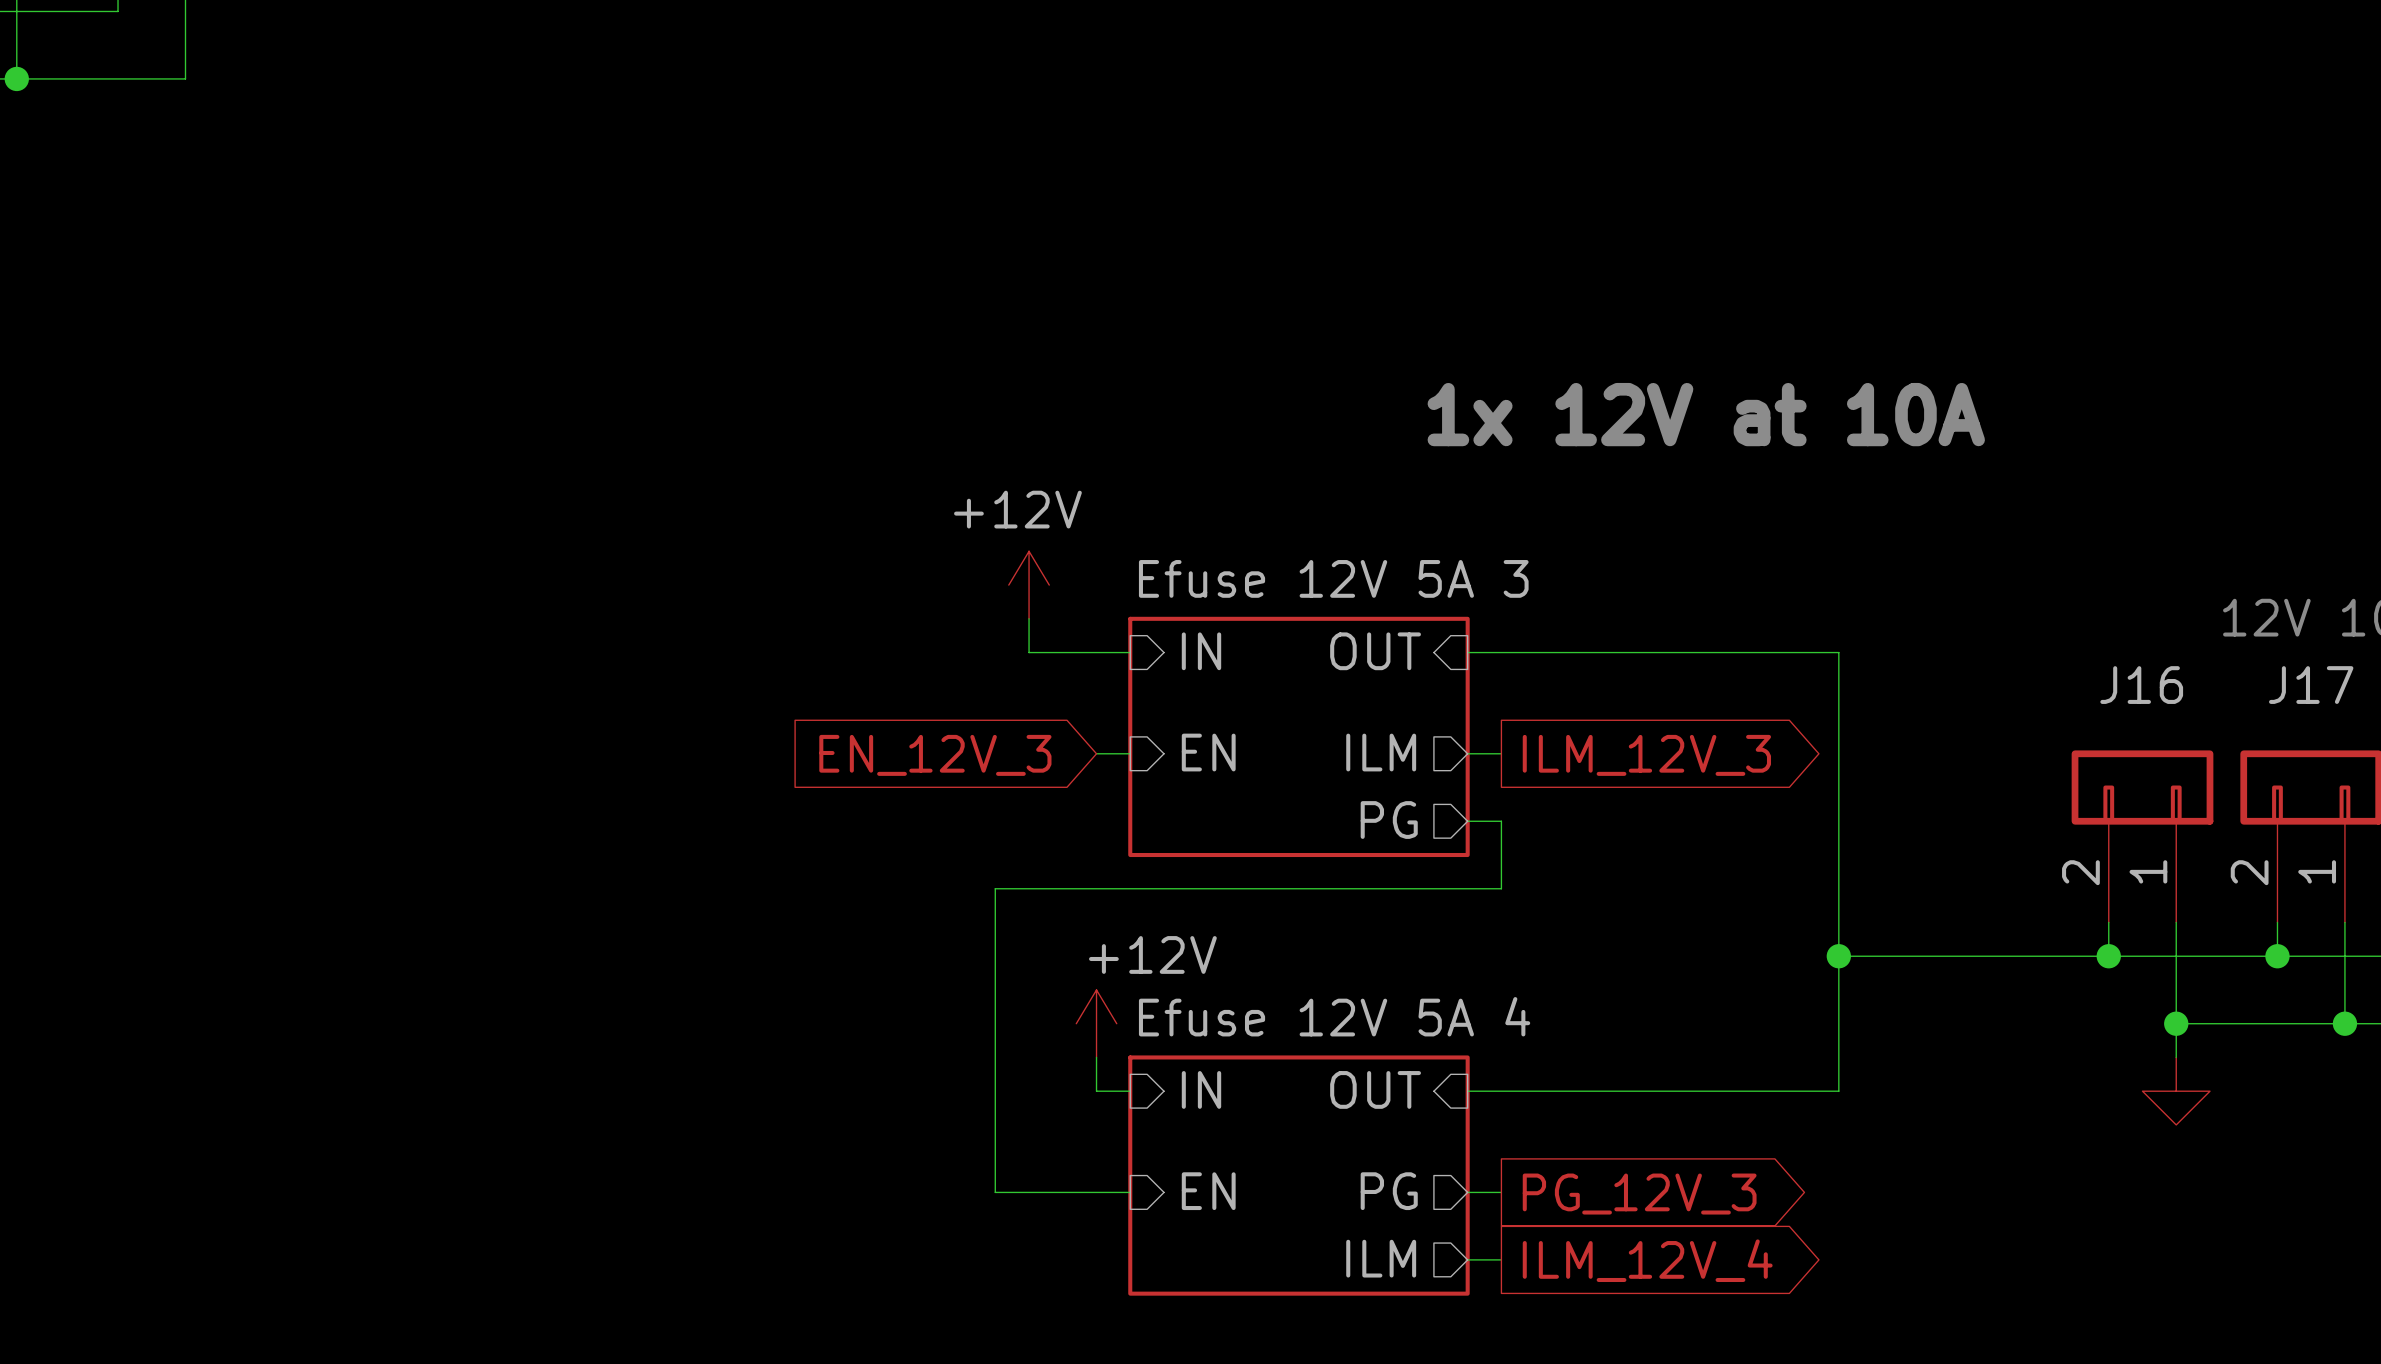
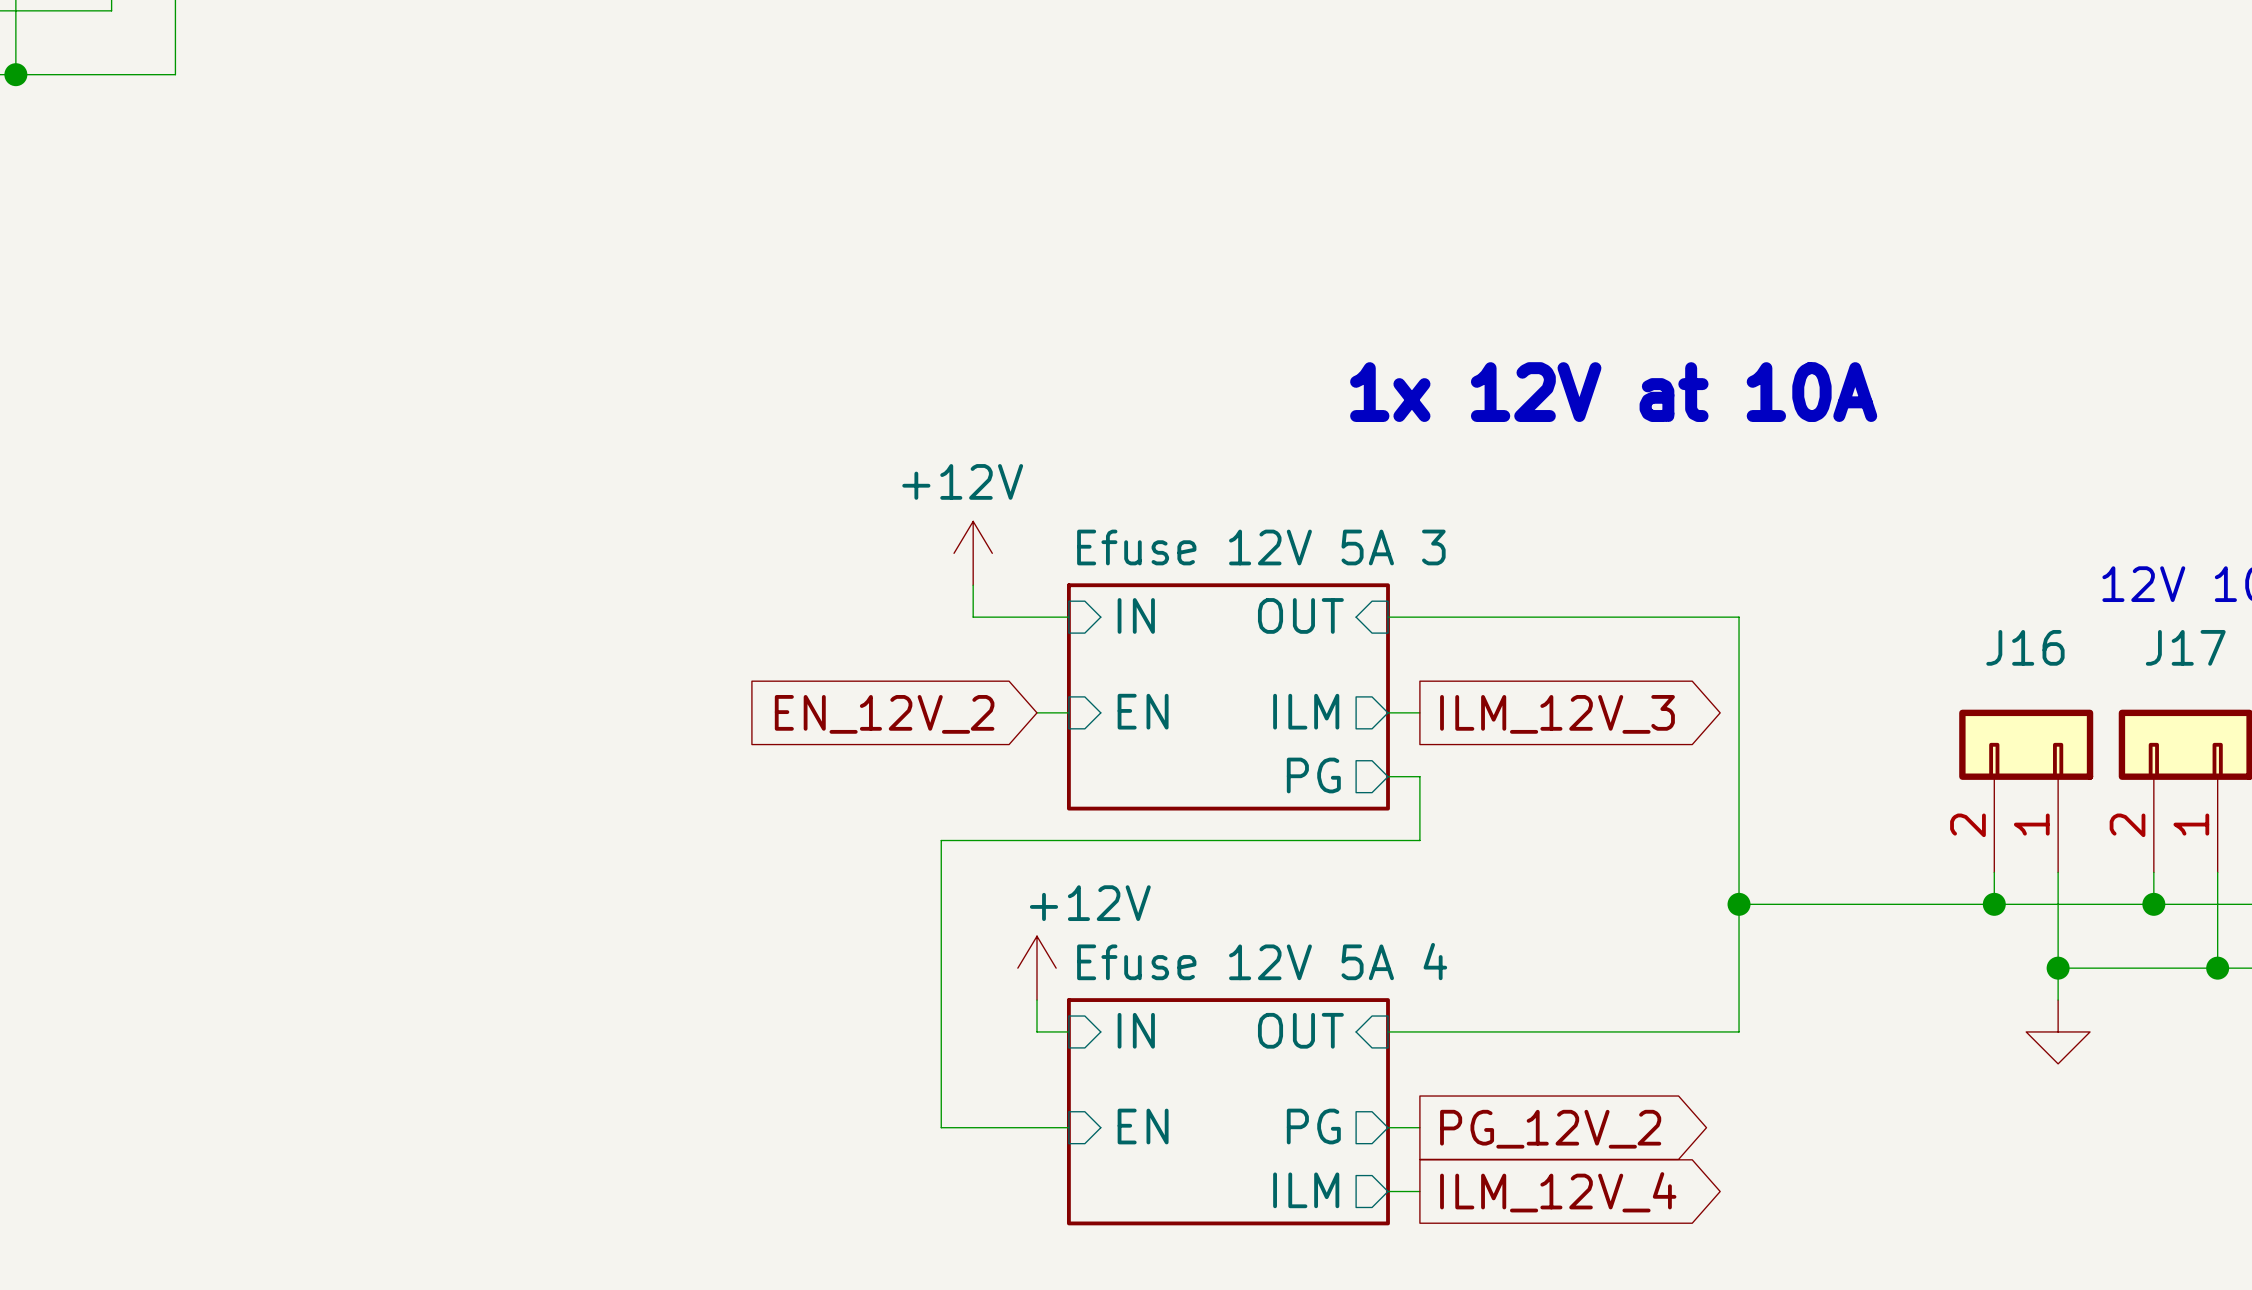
global label: EN_12V_3 (935, 755) -> EN_12V_2 (884, 714)
global label: PG_12V_3 (1639, 1194) -> PG_12V_2 (1550, 1129)

